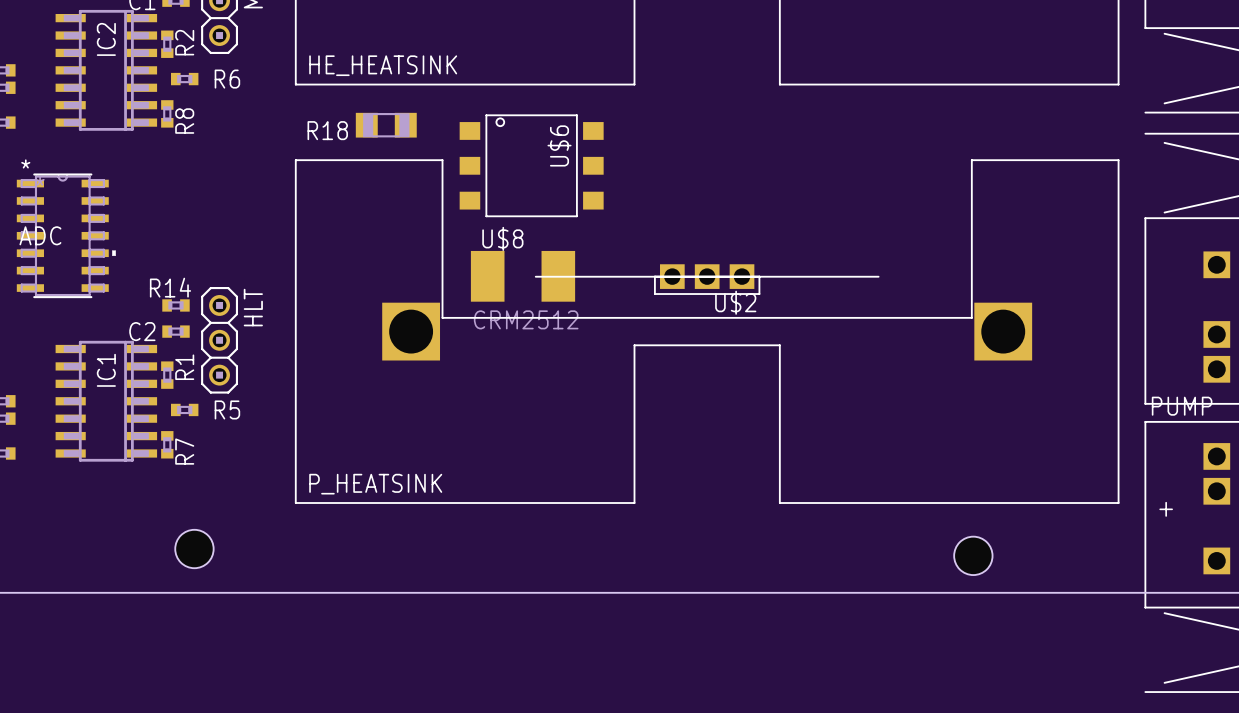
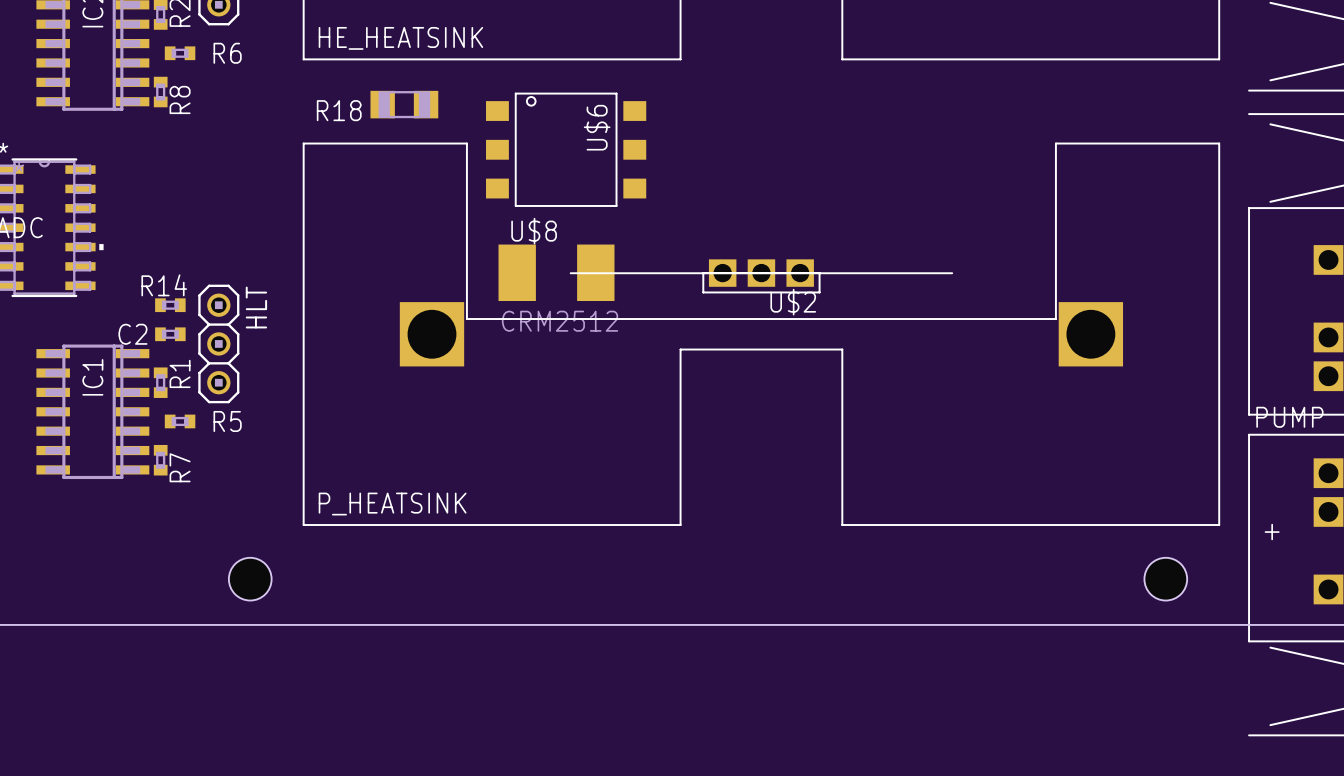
hole position: (194, 549) -> (250, 579)
hole position: (973, 555) -> (1165, 579)

